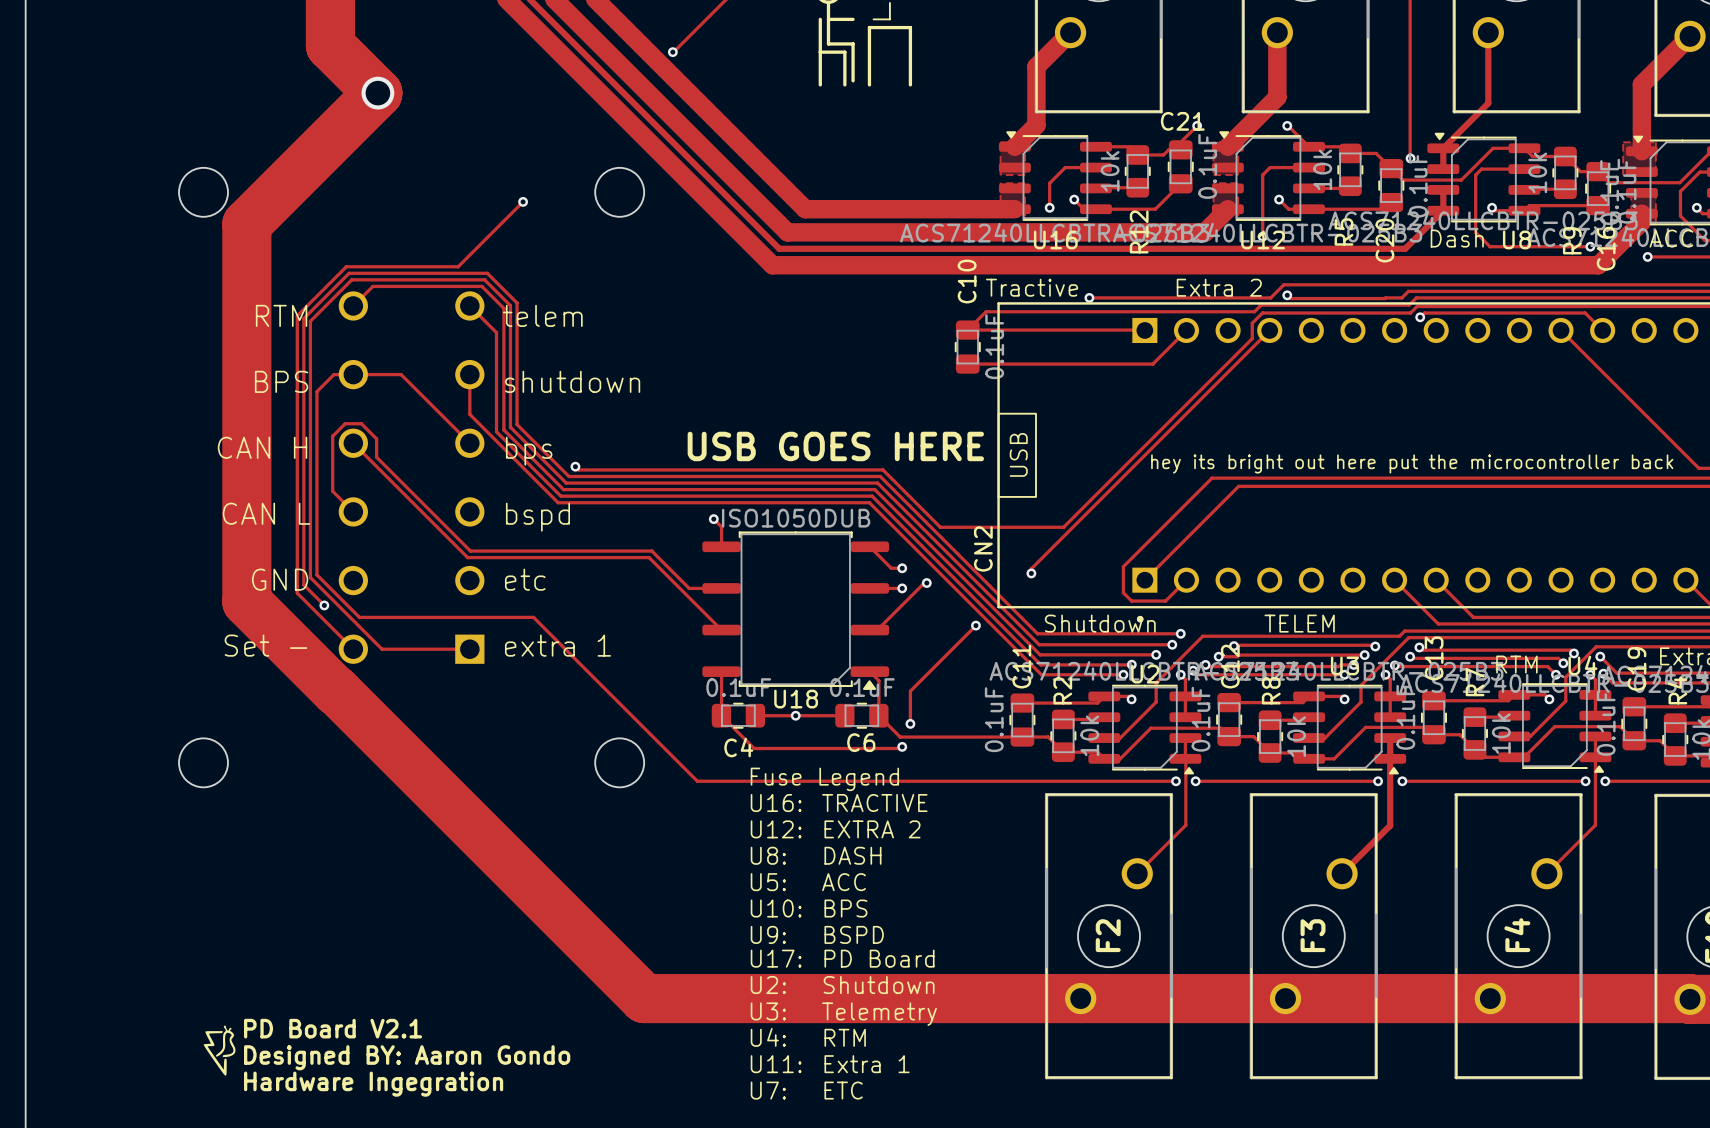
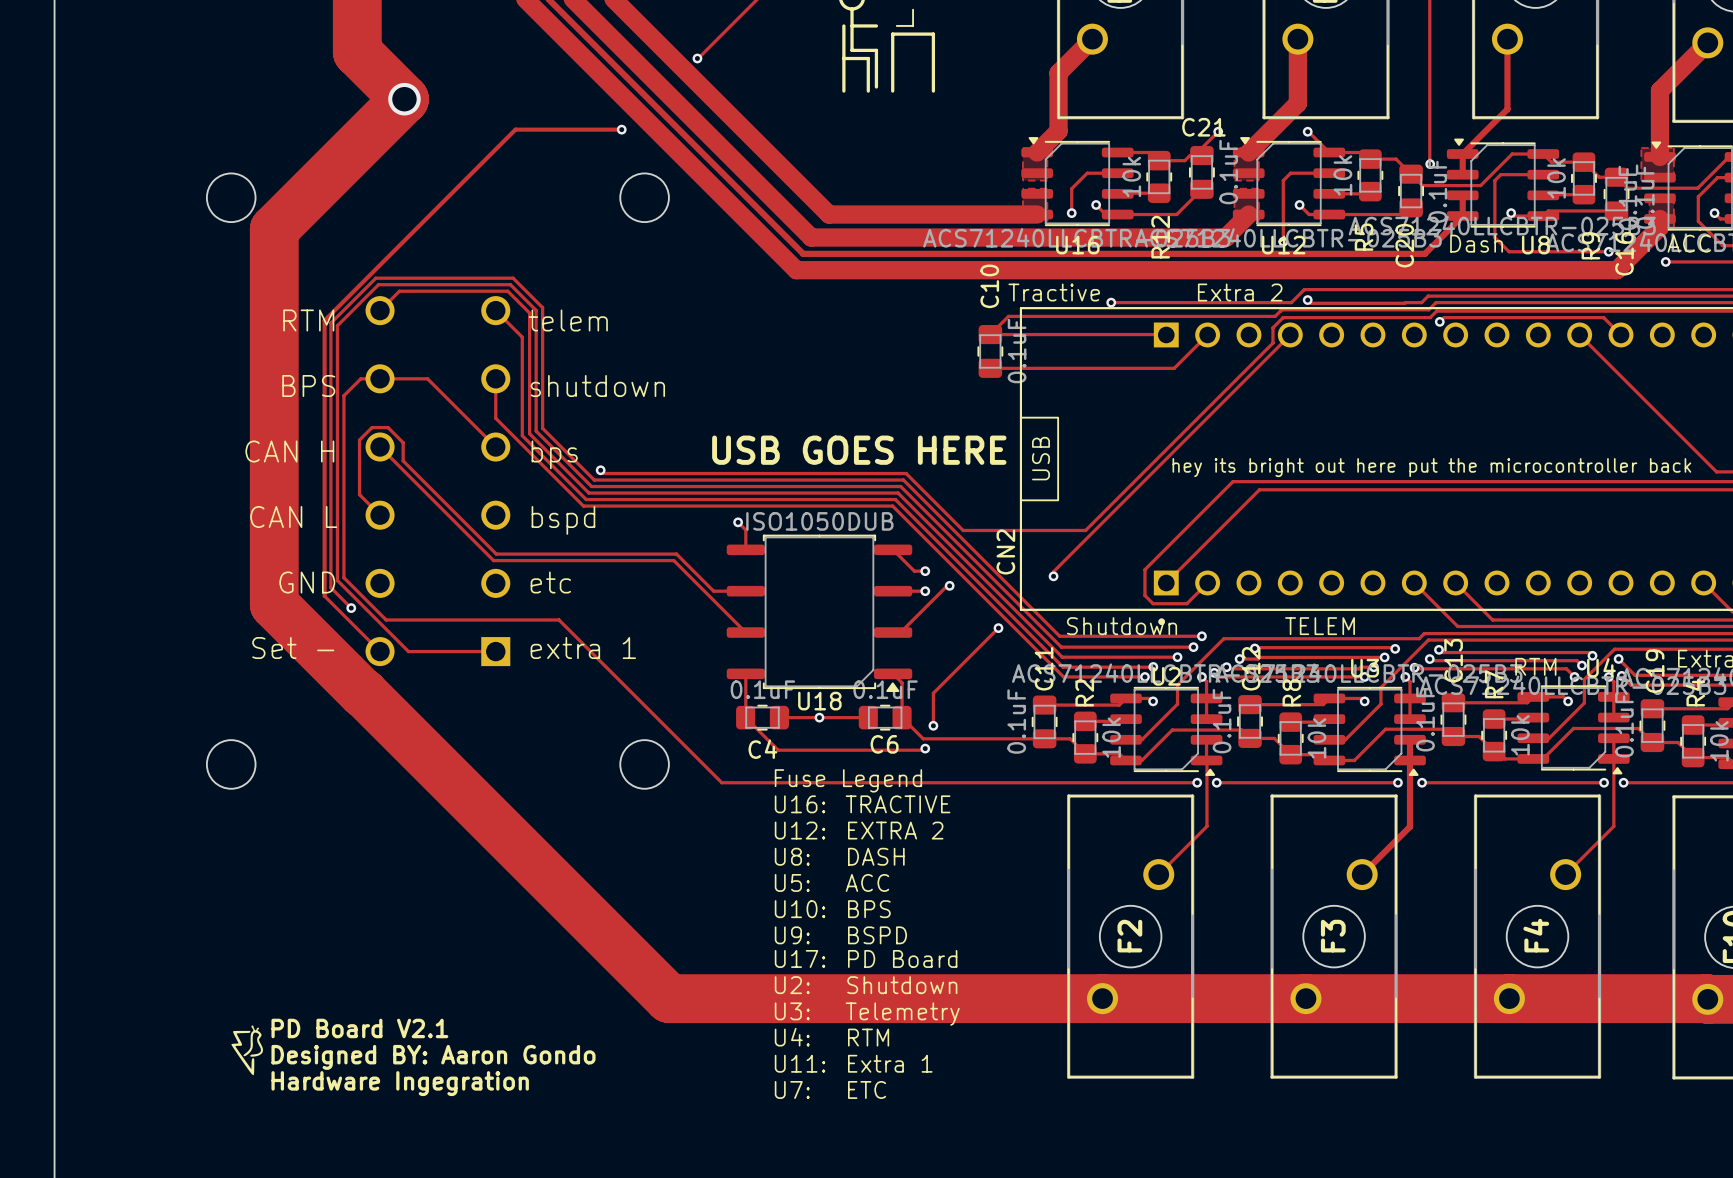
via: none -> (621, 129)
track: (523, 201) (458, 266) (346, 266) (297, 315) (297, 593) -> (621, 129) (515, 129) (324, 320) (324, 596)
via: (523, 201) -> none

